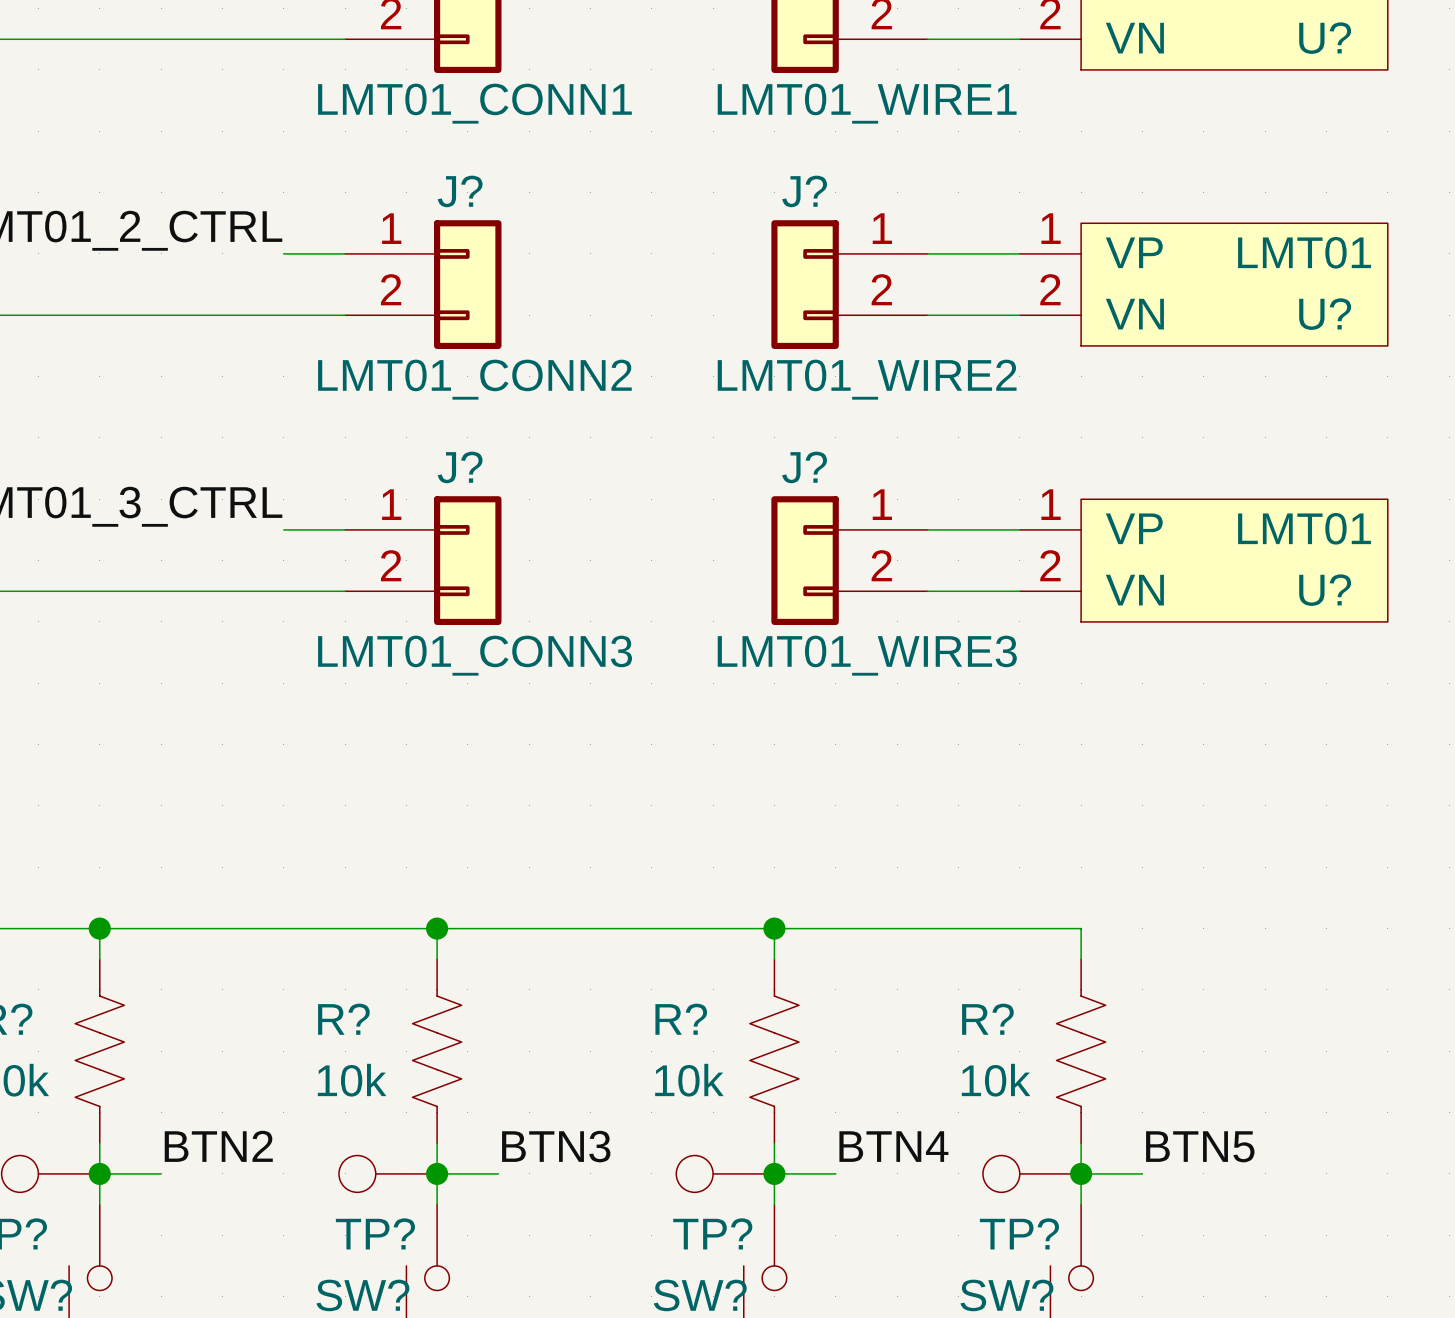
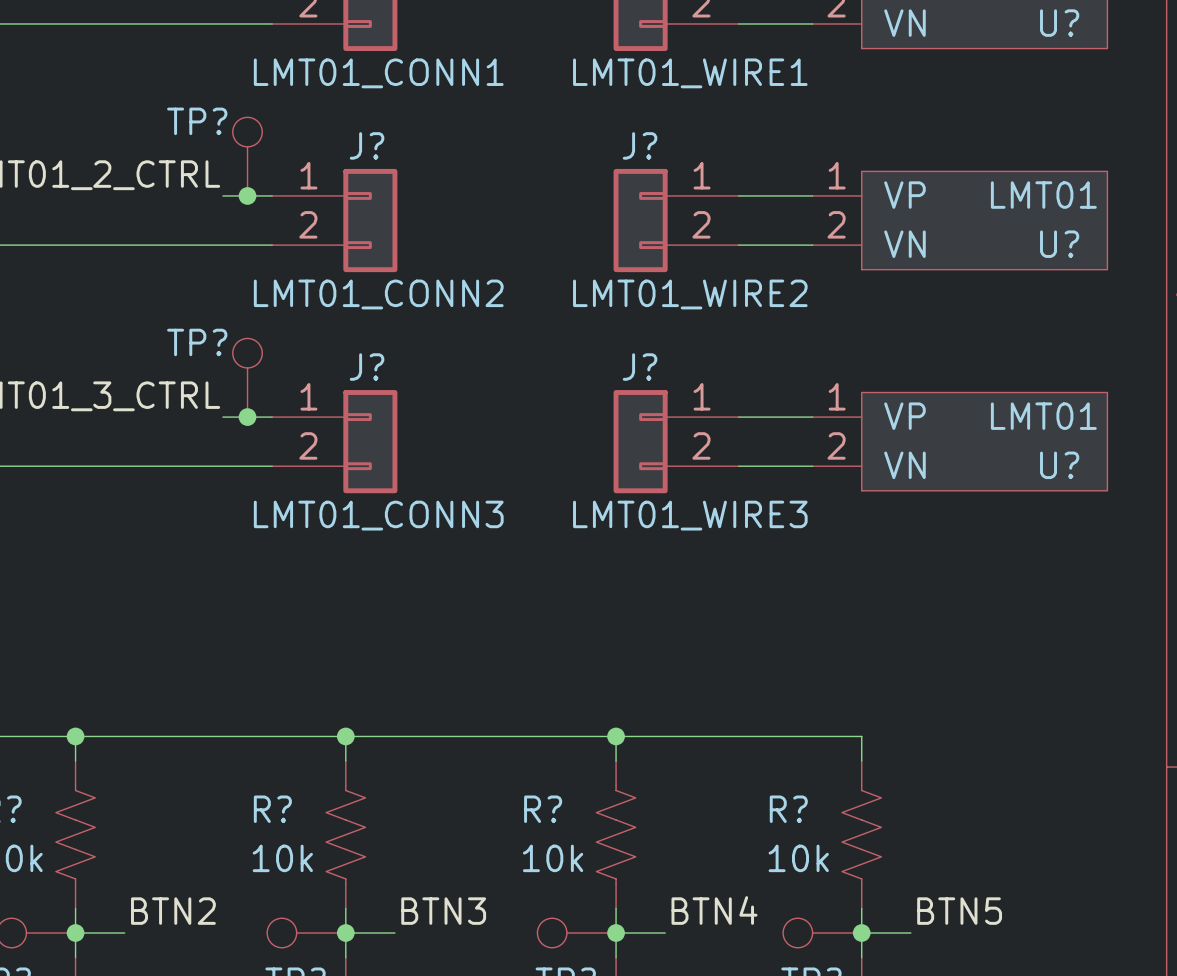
TP?: none -> (247, 156)
junction: none -> (247, 195)
TP?: none -> (247, 377)
junction: none -> (247, 417)

